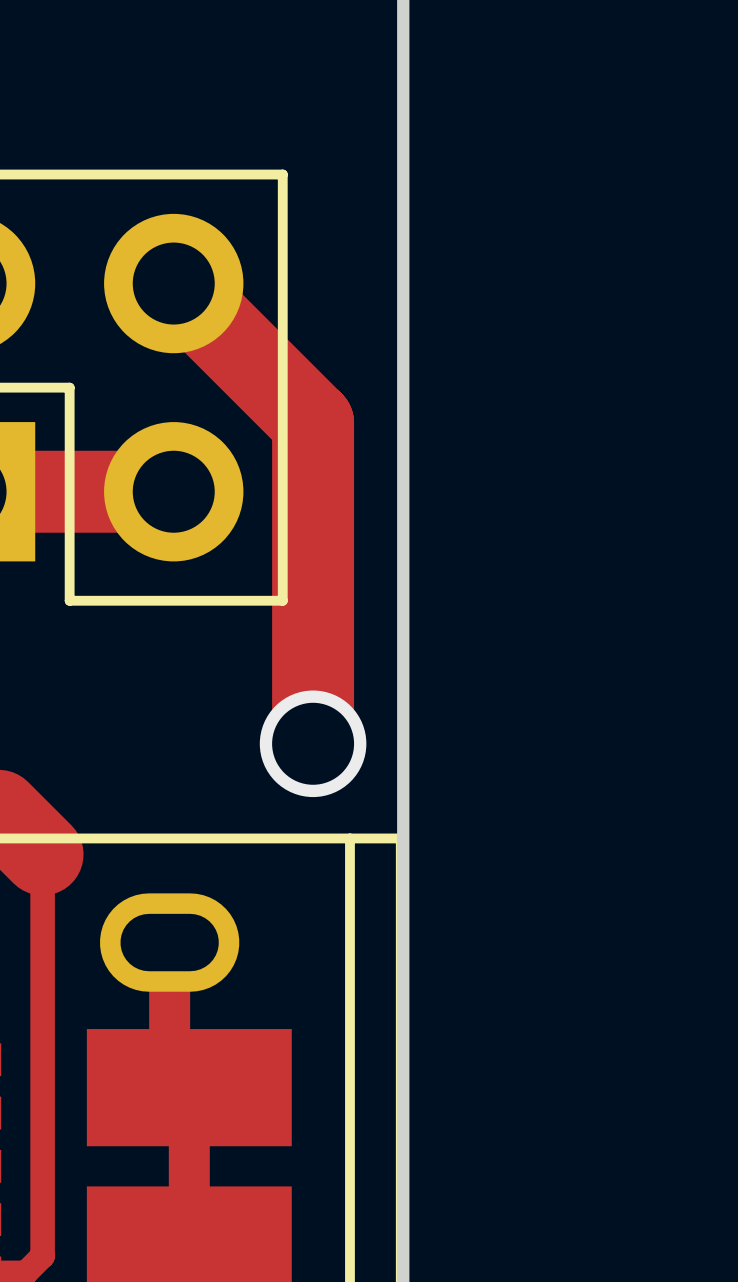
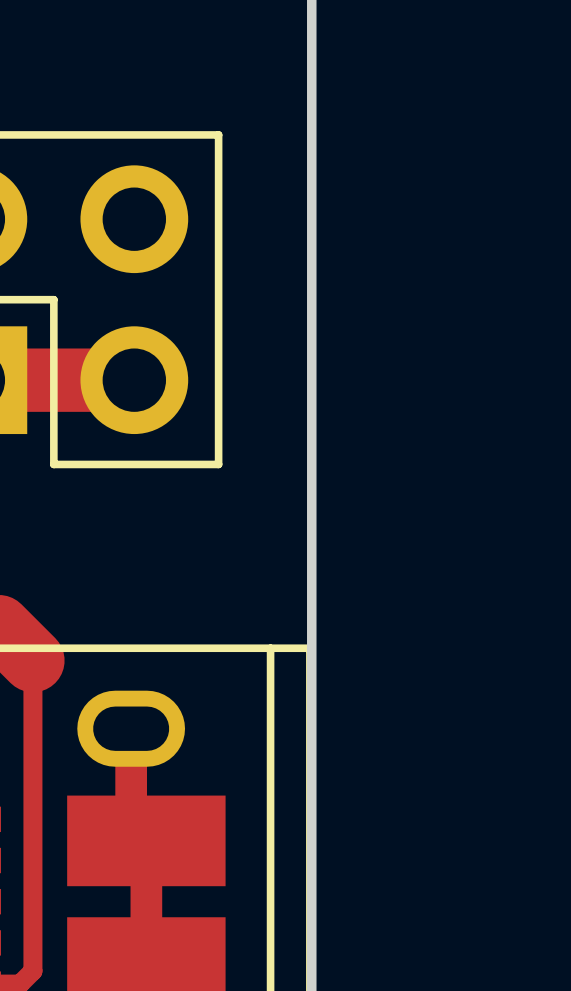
track: (173, 283) (313, 422) (313, 743) -> none
via: (313, 743) -> none

